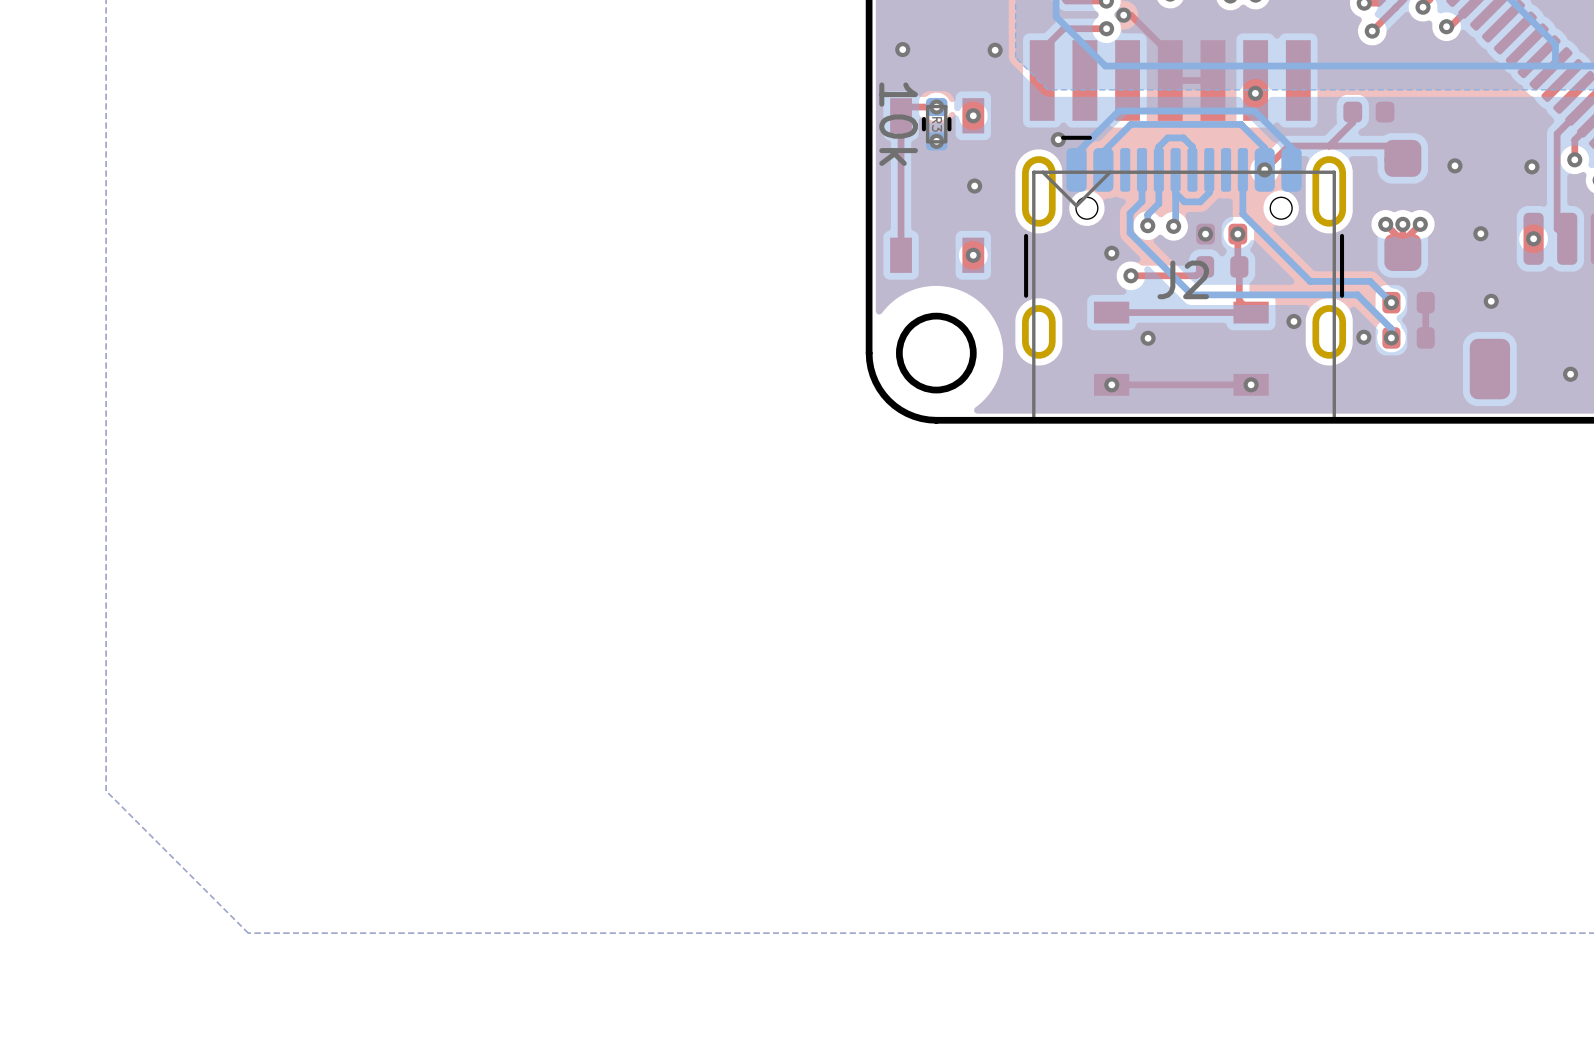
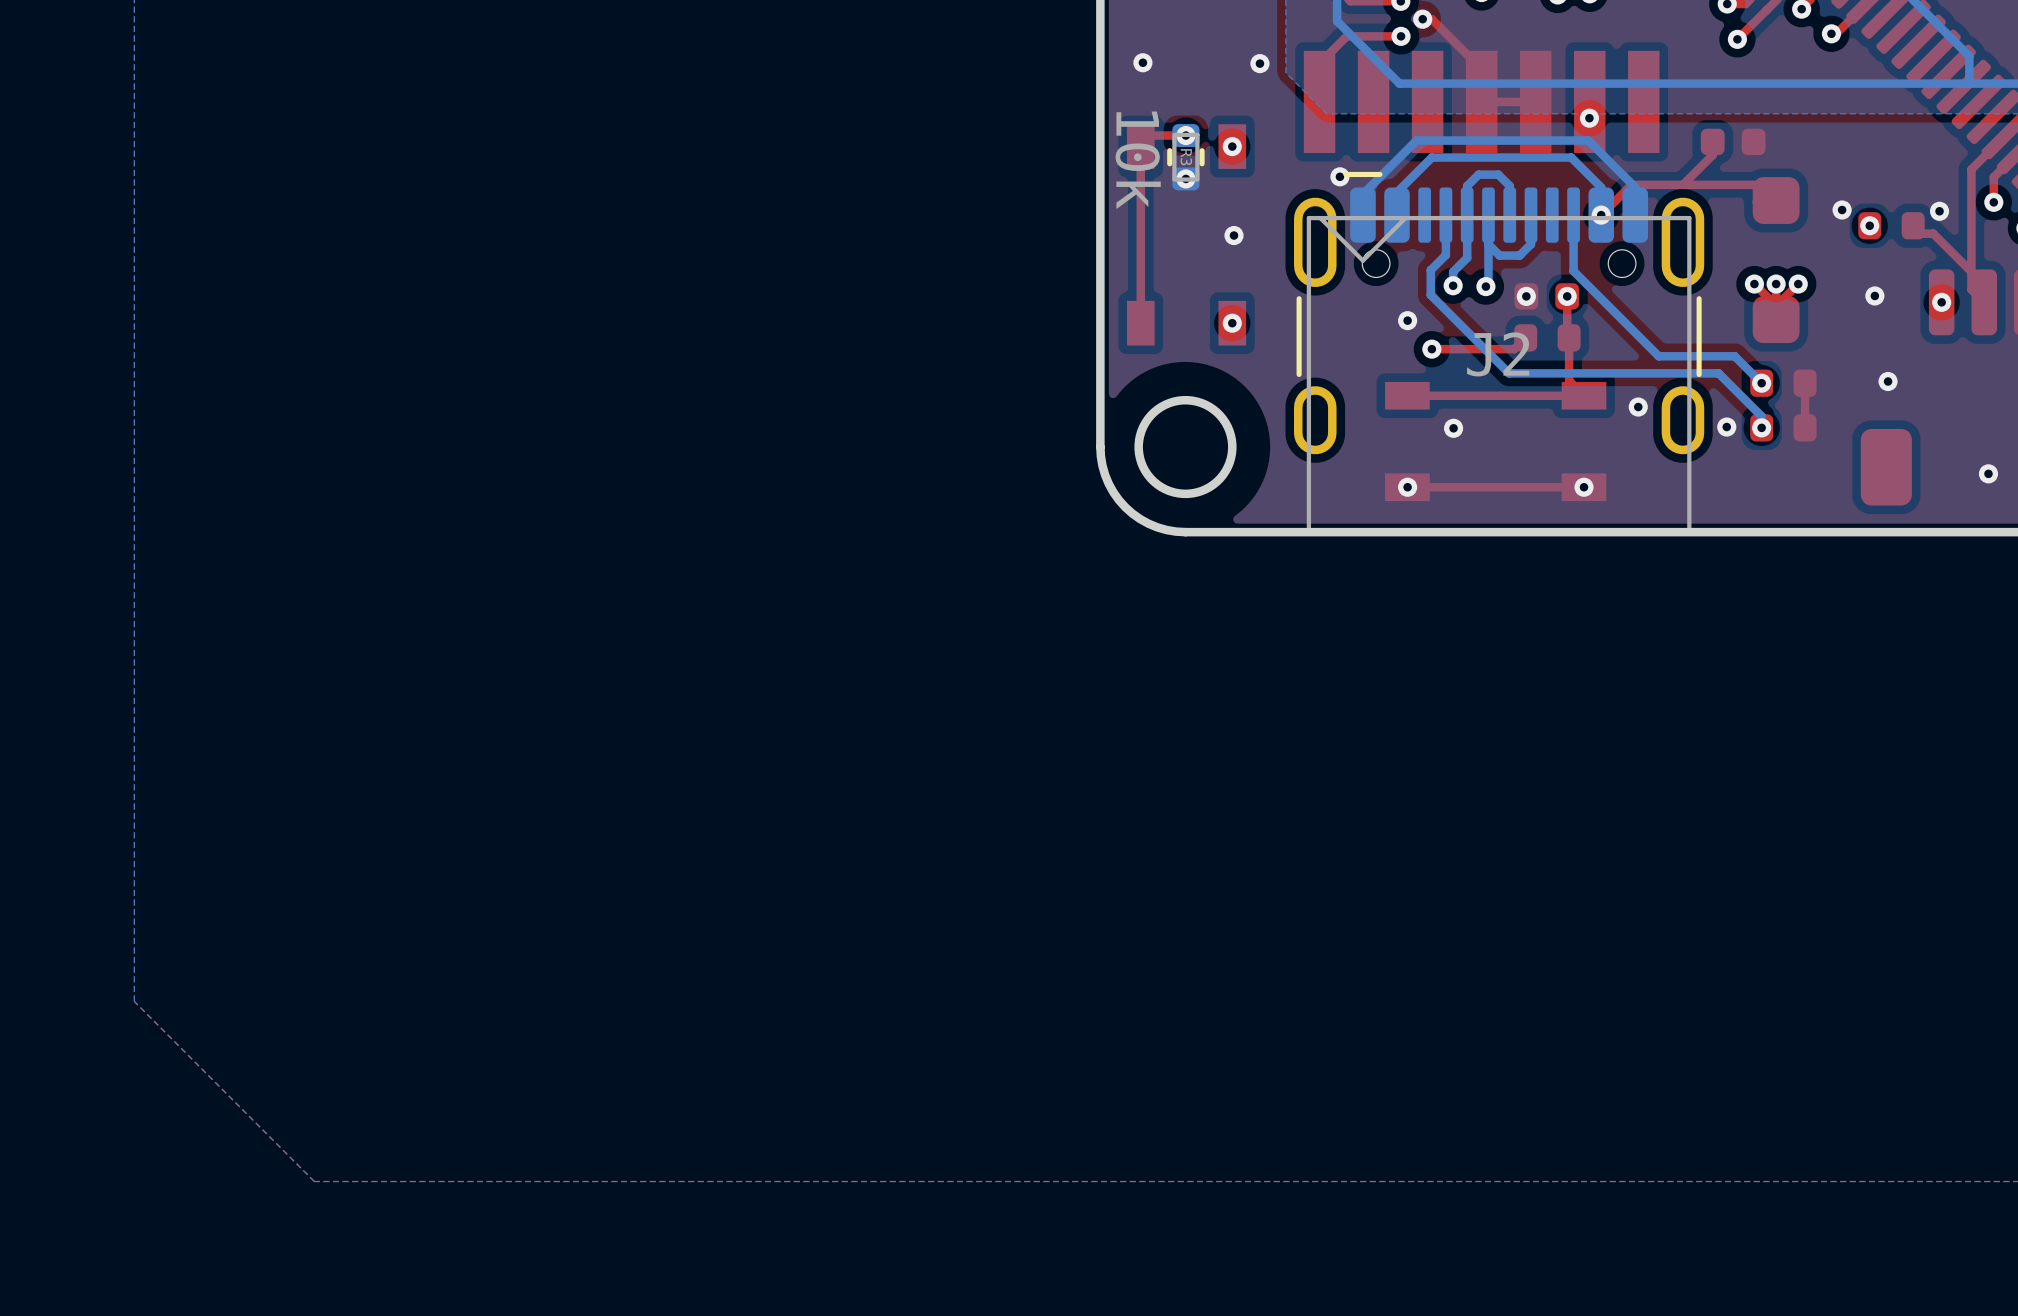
via: none -> (1869, 225)
part: none -> (1891, 225)
top track: none -> (1913, 225) (1921, 233) (1933, 233) (1984, 284) (1984, 302)

